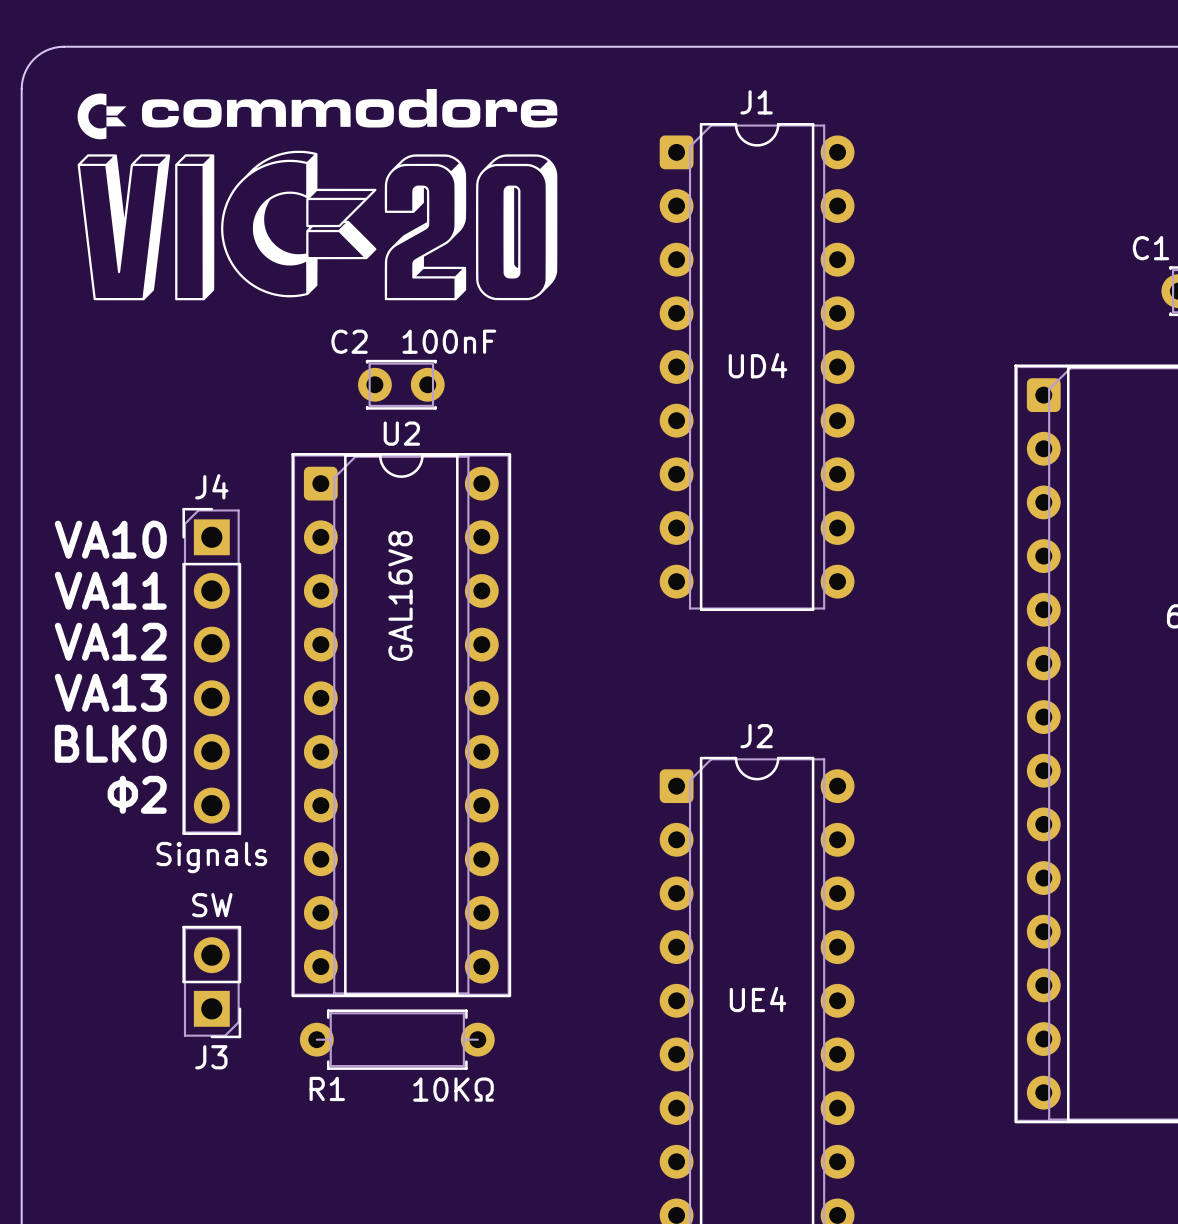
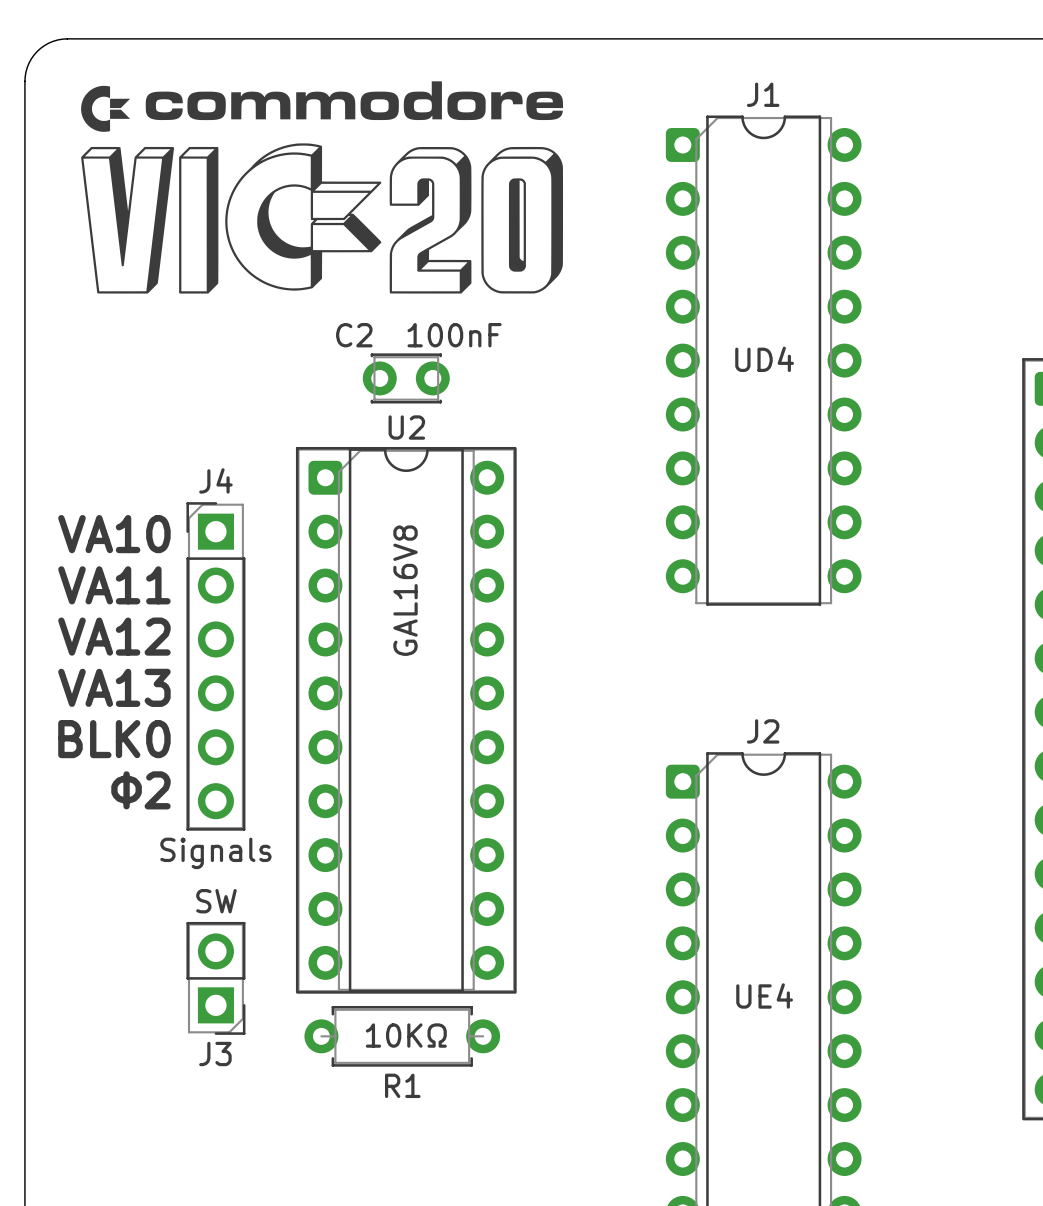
R1 name position: R1 (327, 1088) -> R1 (402, 1085)
R1 value position: 10KΩ (453, 1089) -> 10KΩ (406, 1035)

